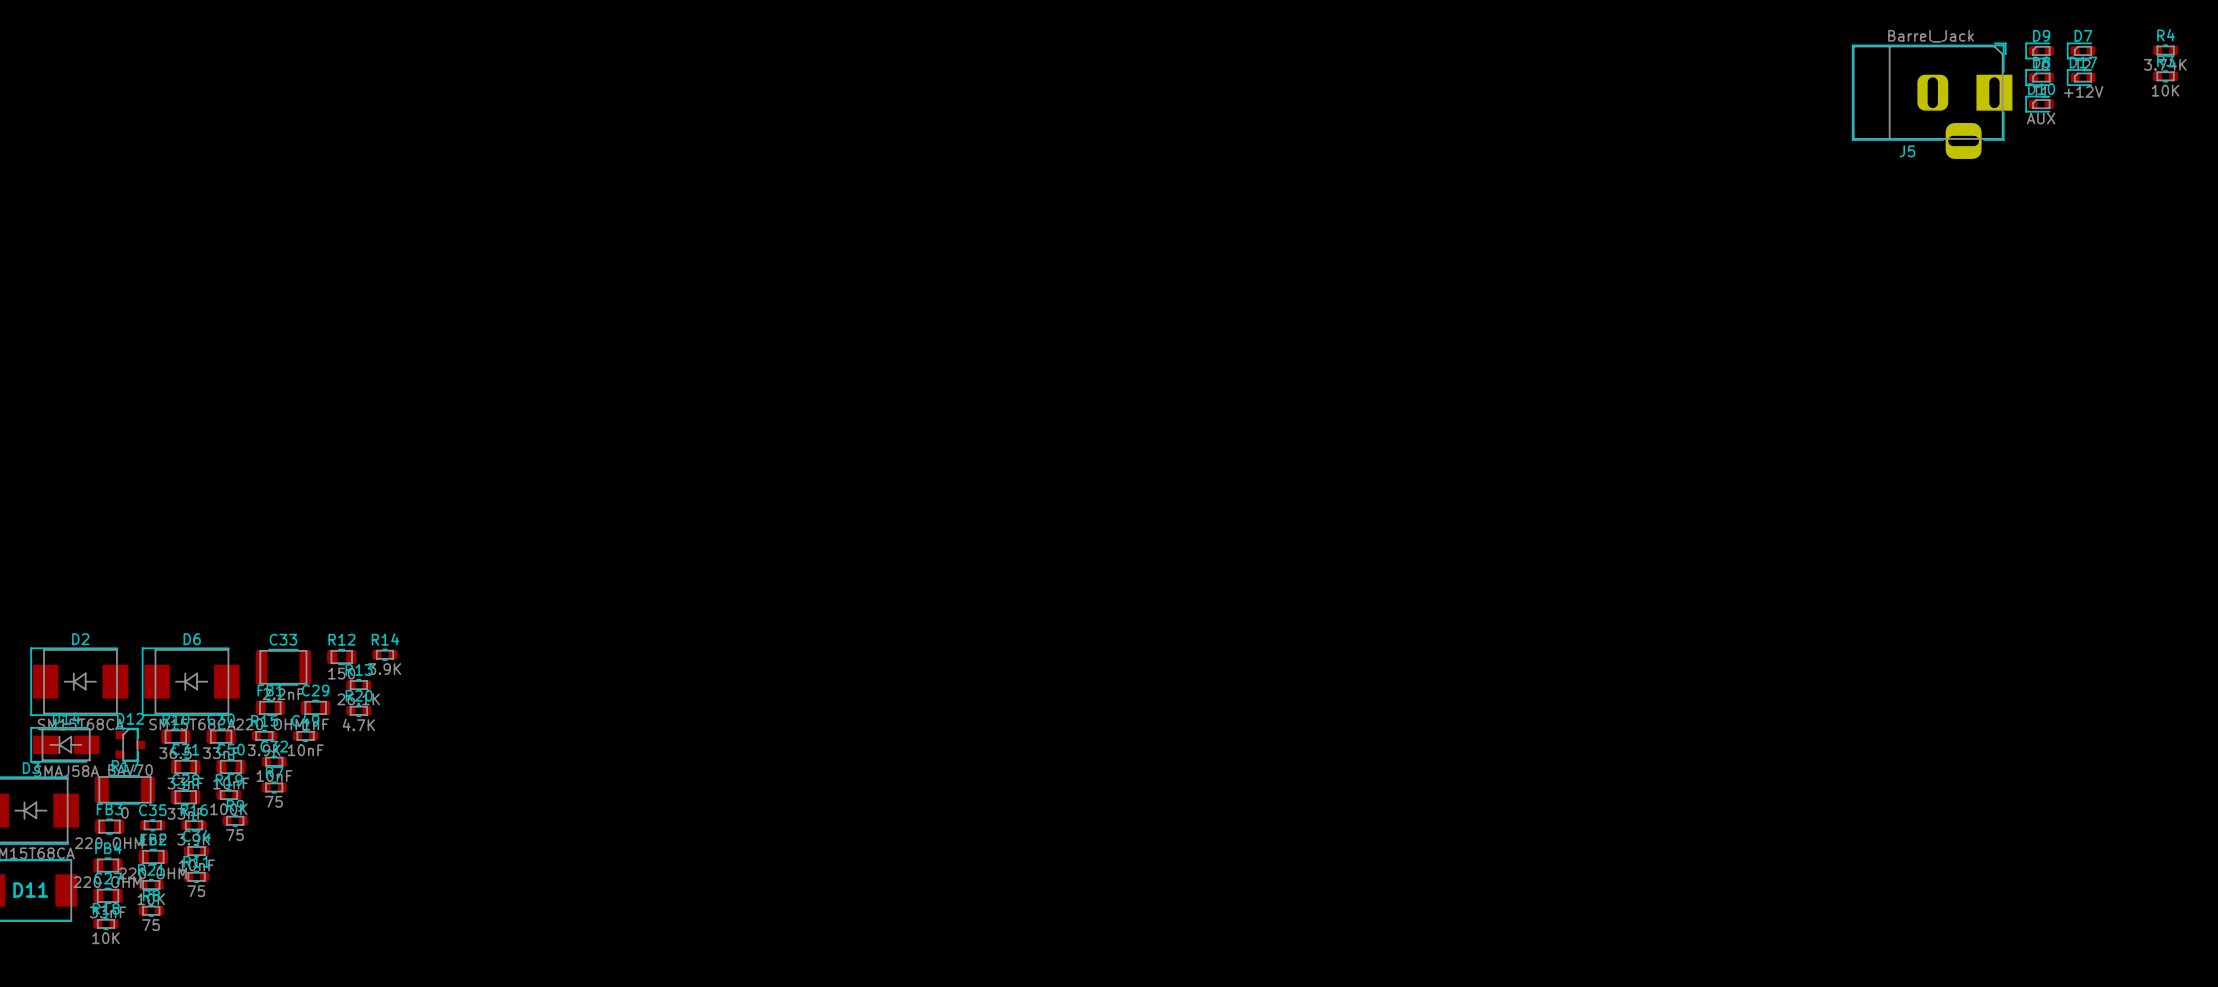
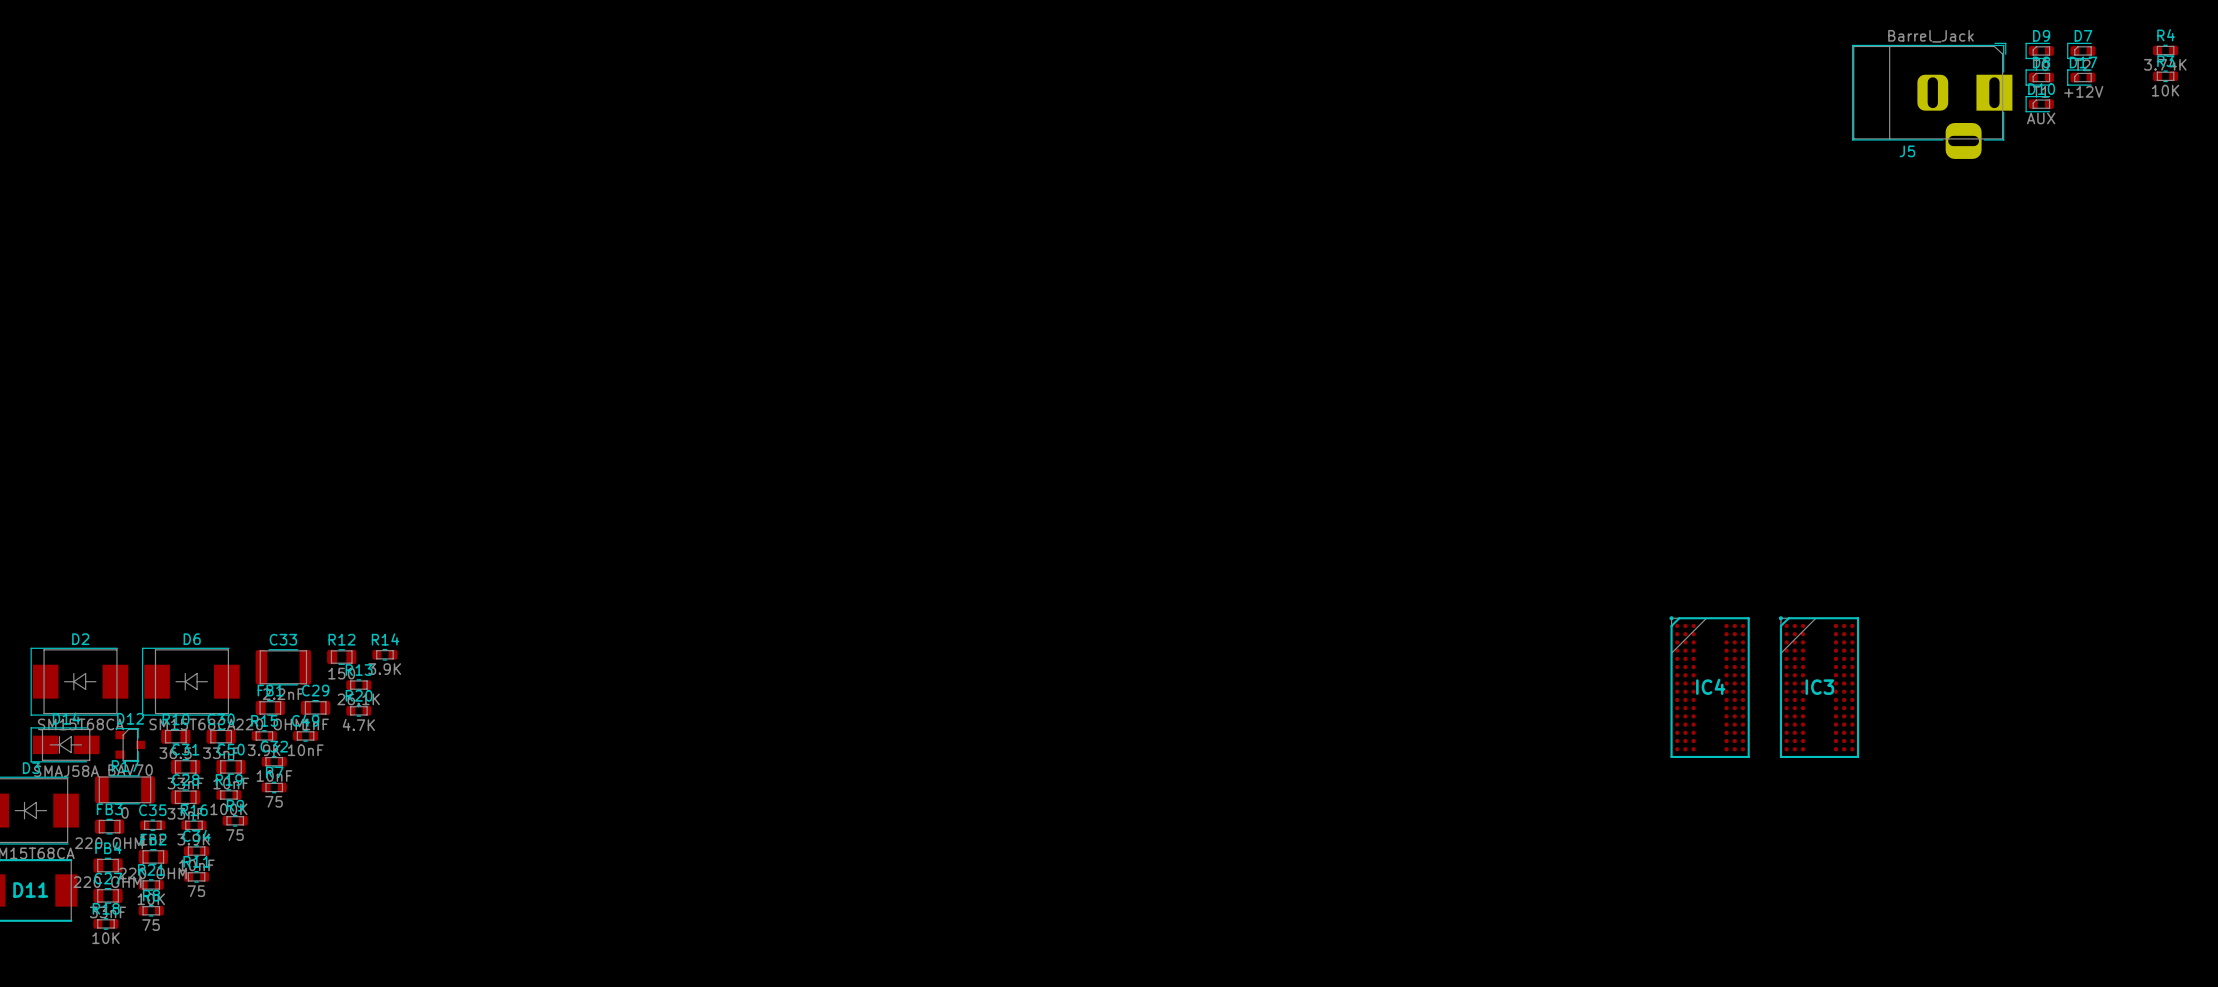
IC4: none -> (1709, 687)
IC3: none -> (1818, 687)

